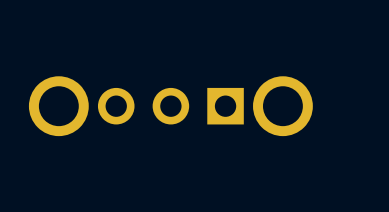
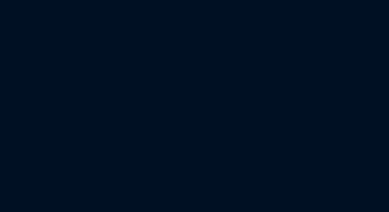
part: (170, 106) -> none

